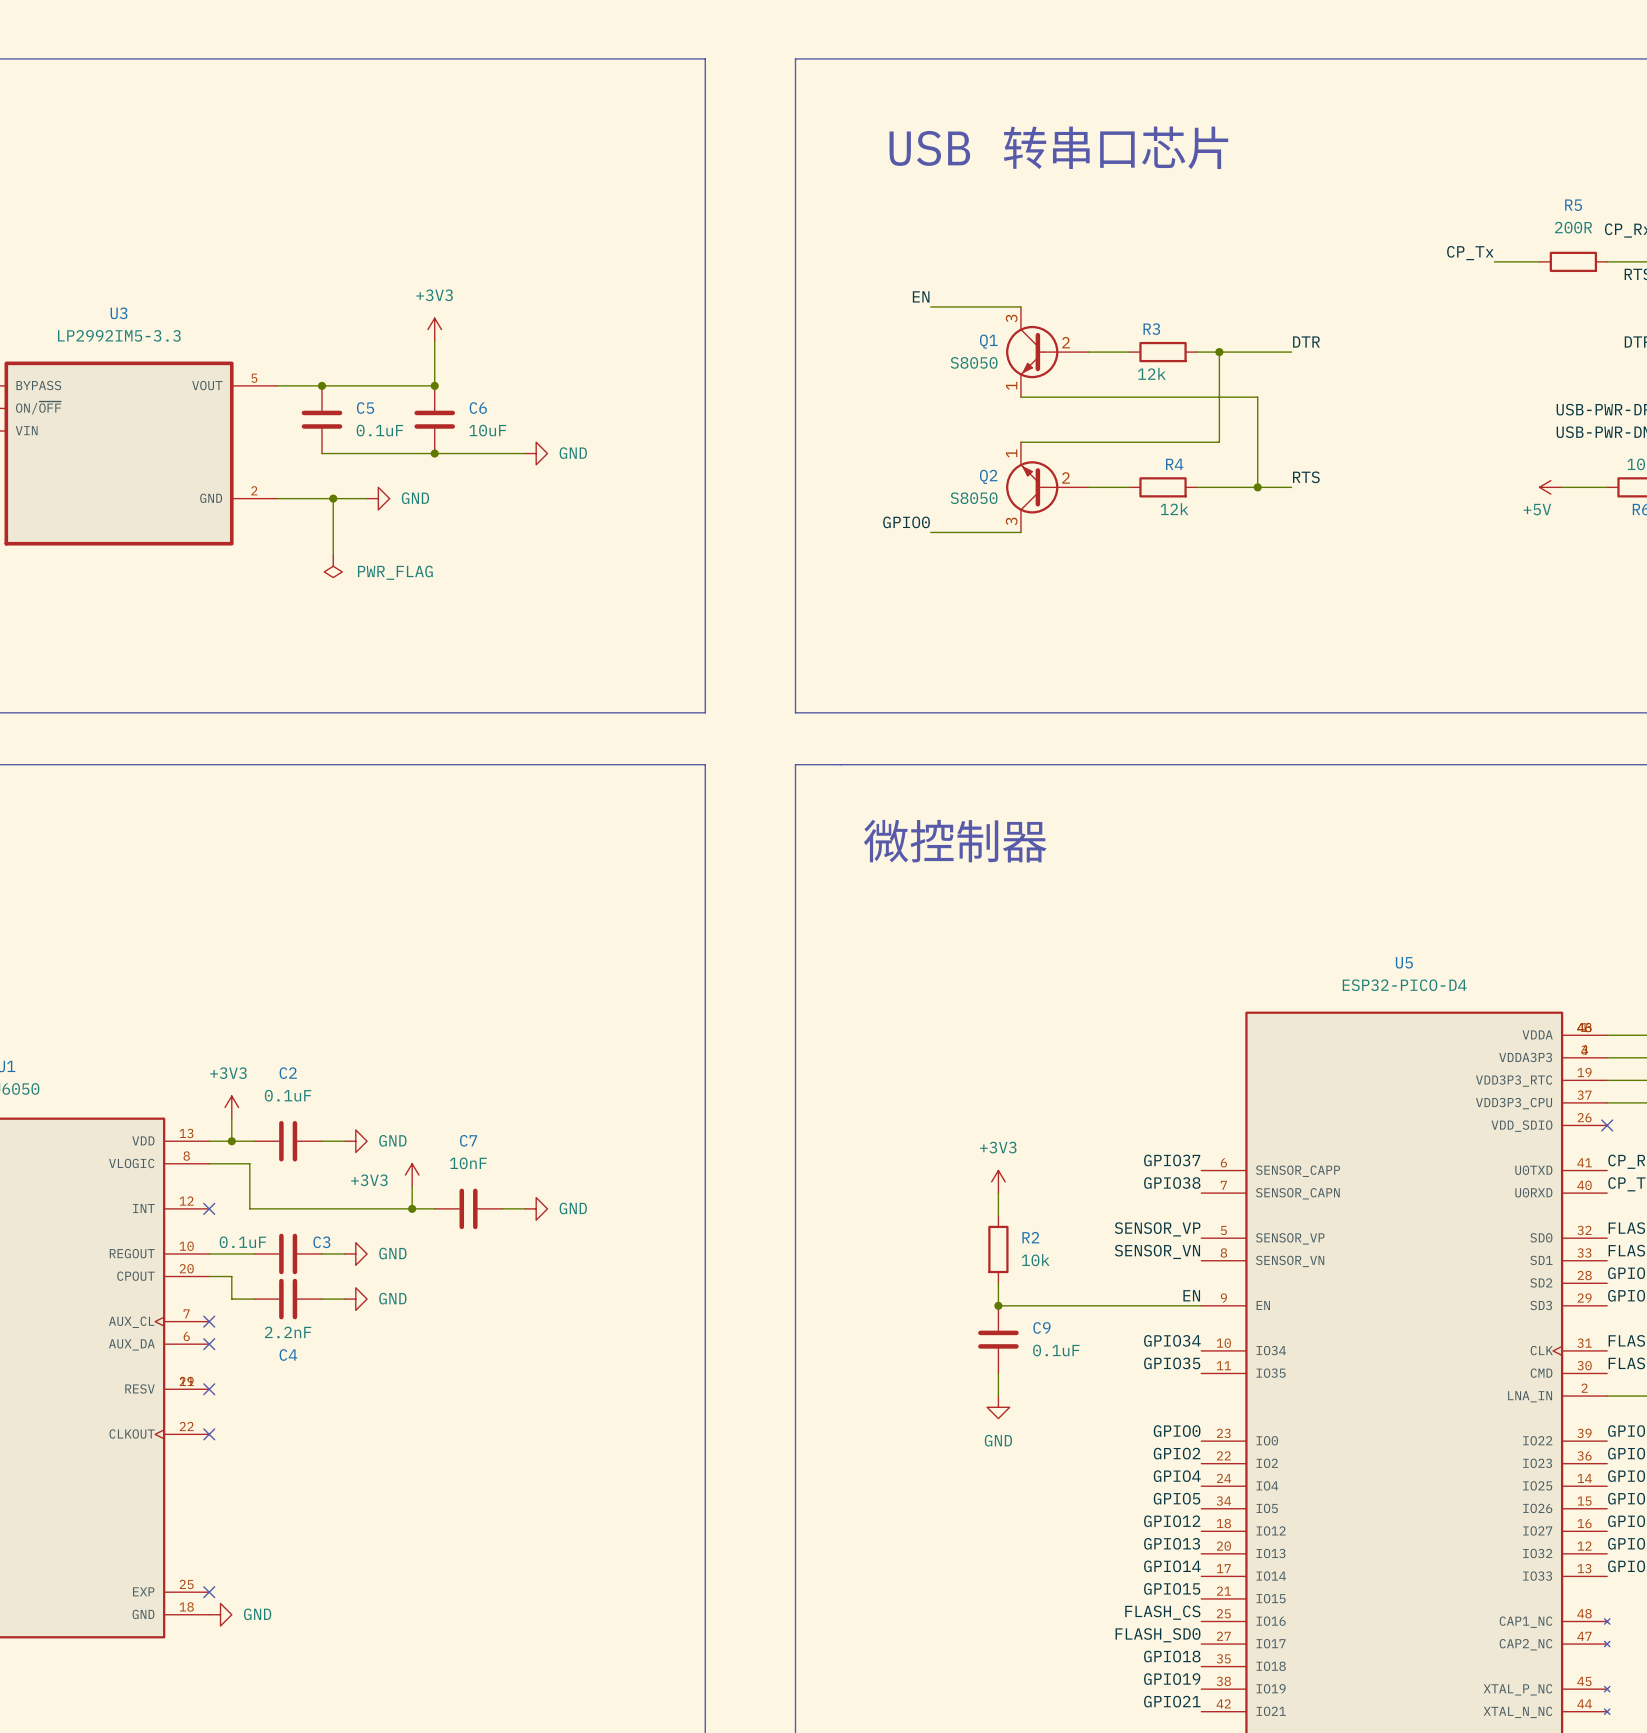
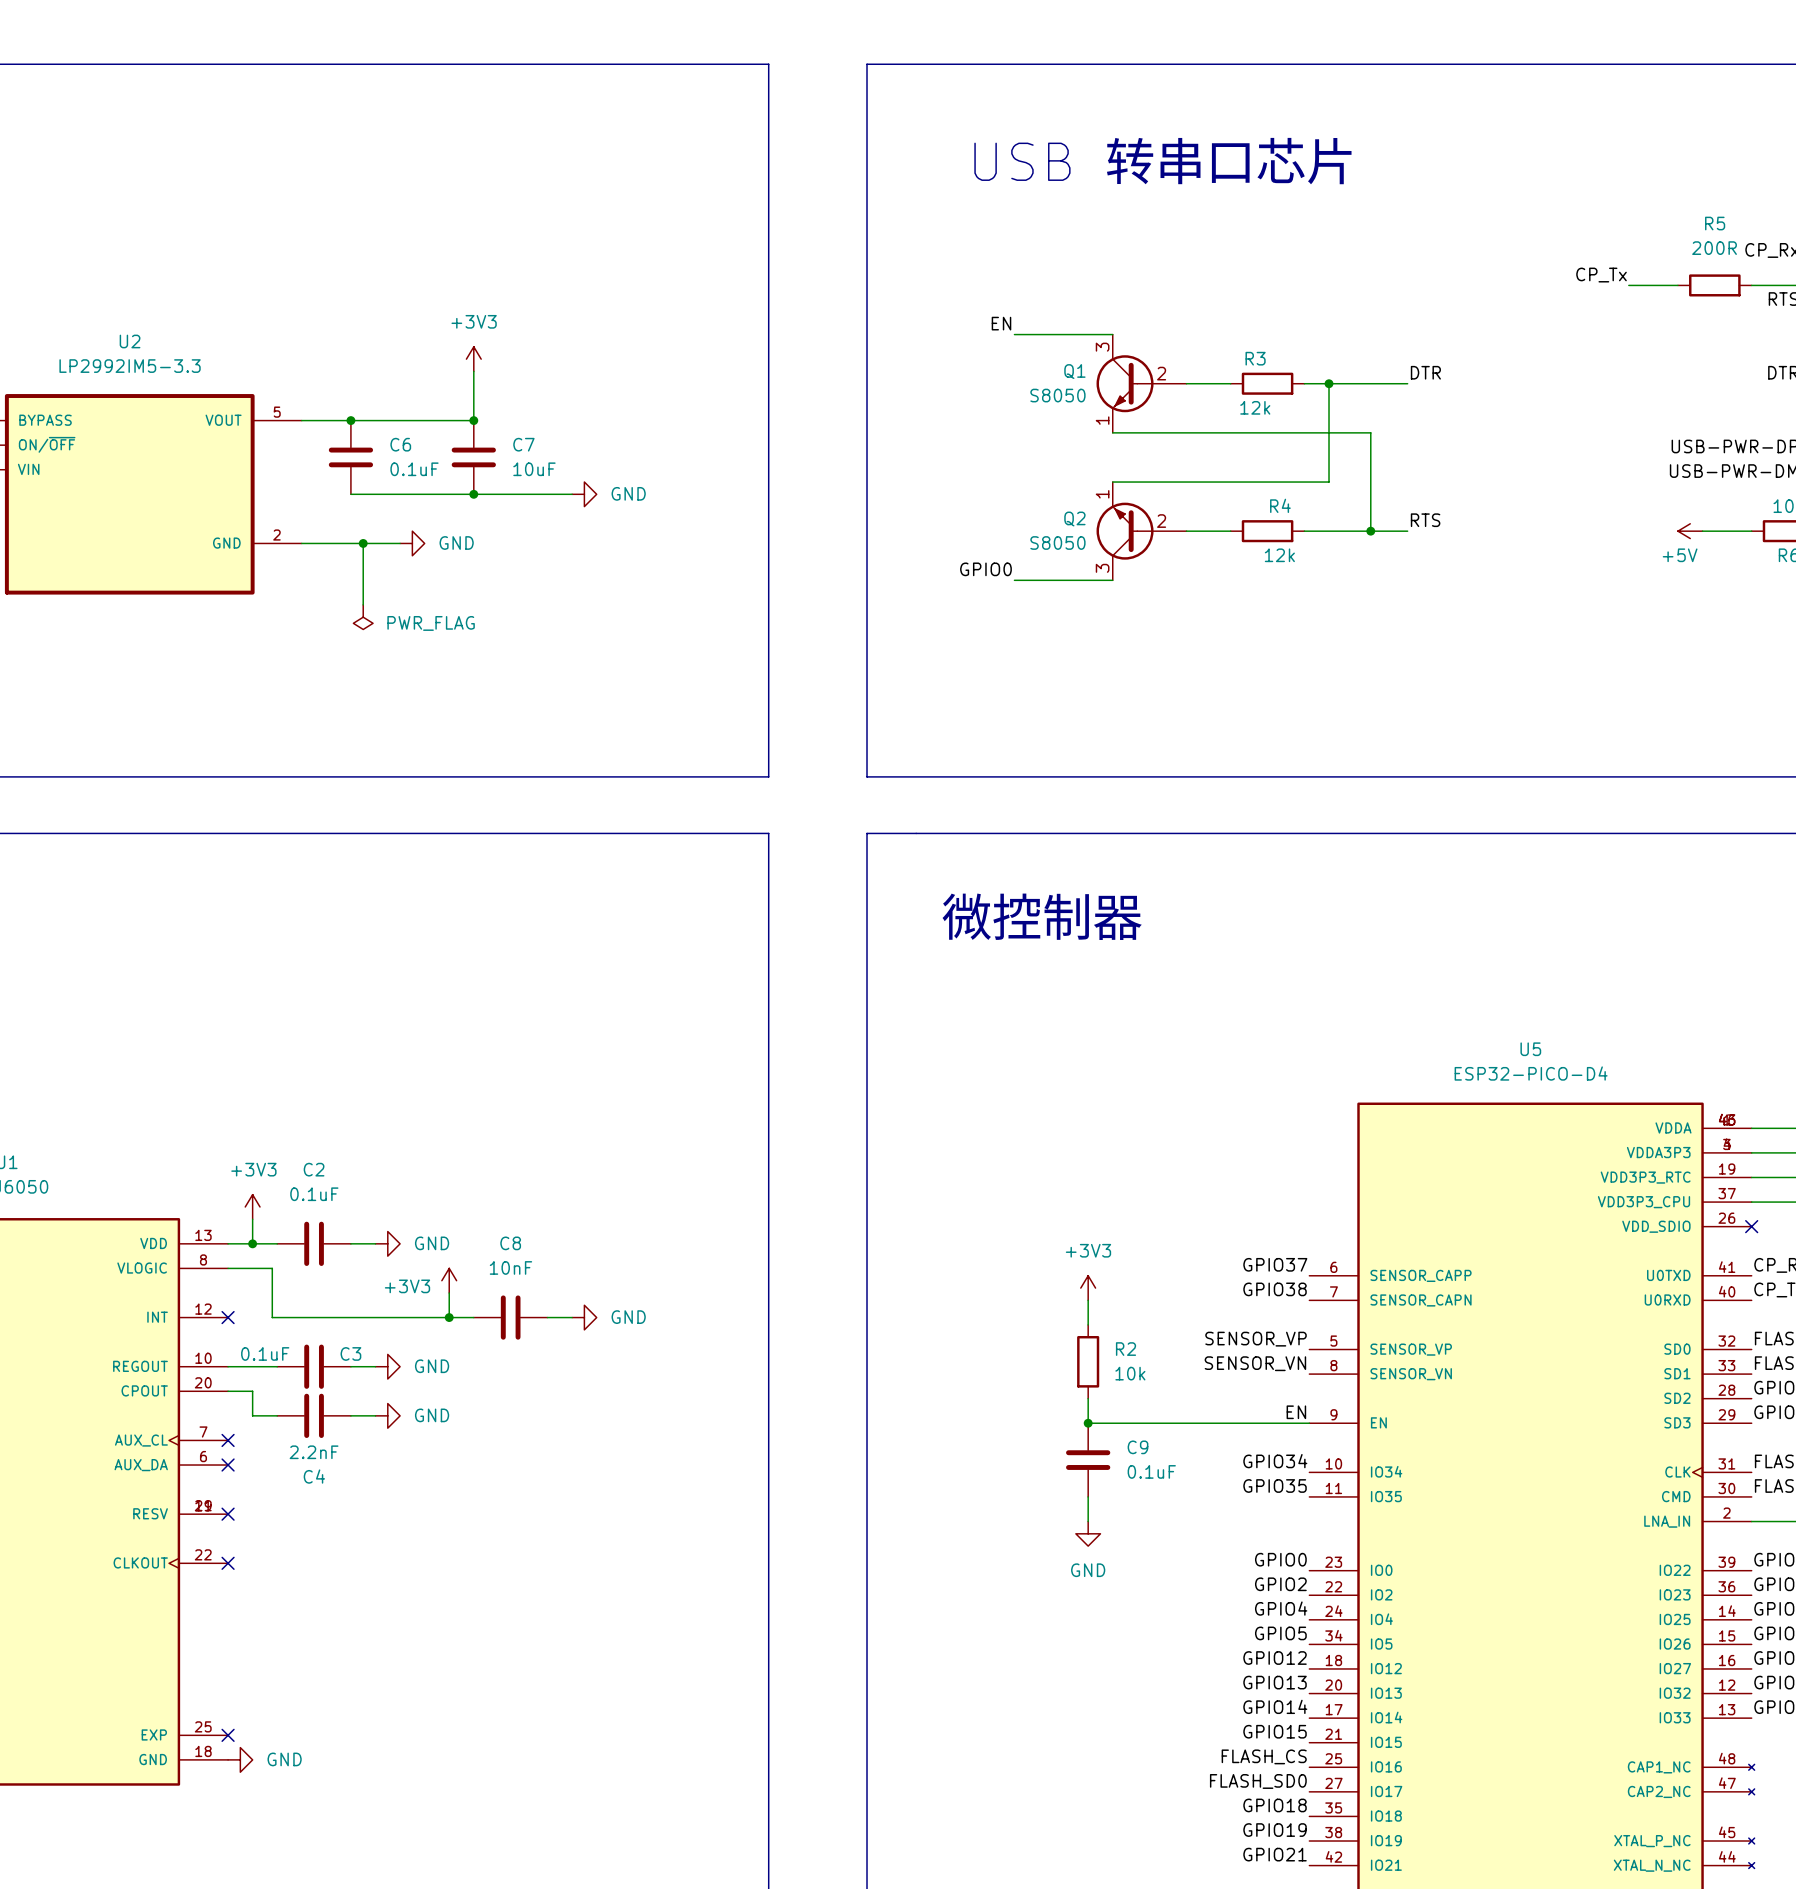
U3 name: U3 (119, 313) -> U2 (130, 341)
C5 name: C5 (365, 408) -> C6 (400, 444)
C6 name: C6 (478, 408) -> C7 (523, 444)
C7 name: C7 (468, 1140) -> C8 (510, 1243)

